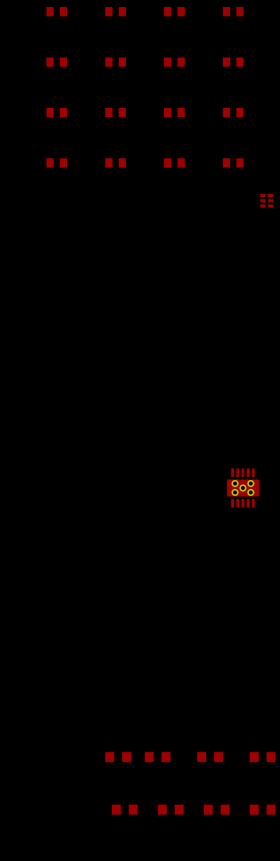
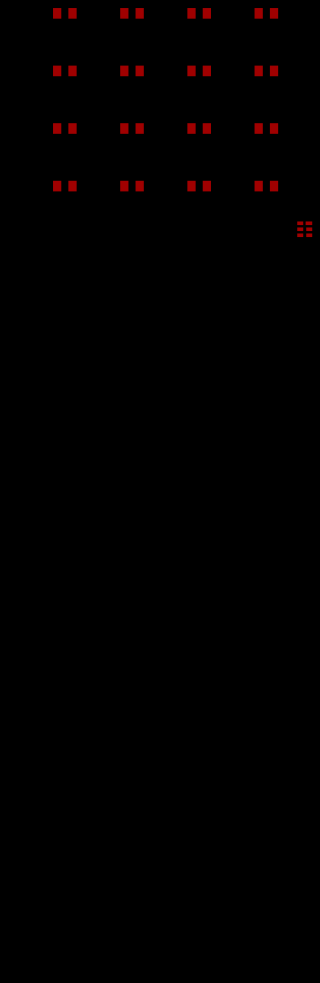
part: (242, 487) -> none
part: (118, 757) -> none
part: (157, 757) -> none
part: (210, 757) -> none
part: (262, 757) -> none
part: (124, 809) -> none
part: (170, 809) -> none
part: (216, 809) -> none
part: (262, 809) -> none

